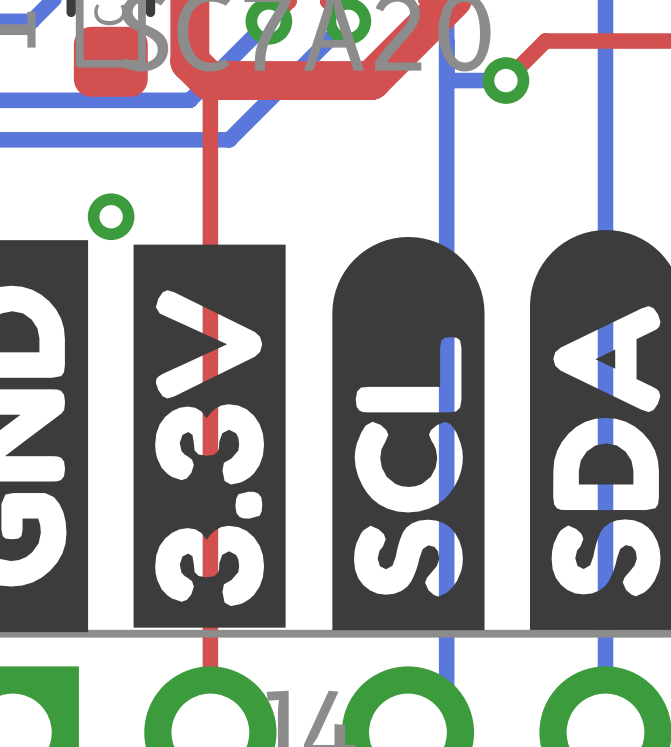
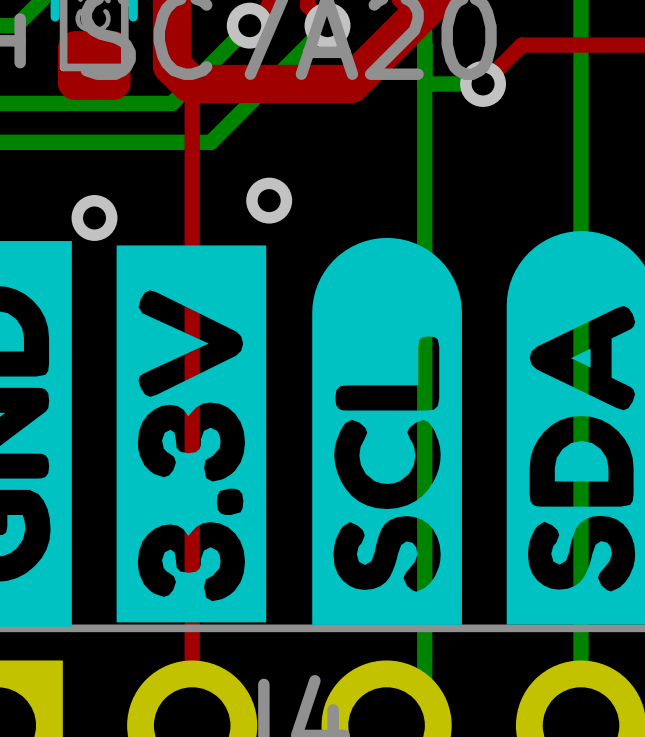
via: none -> (269, 200)

